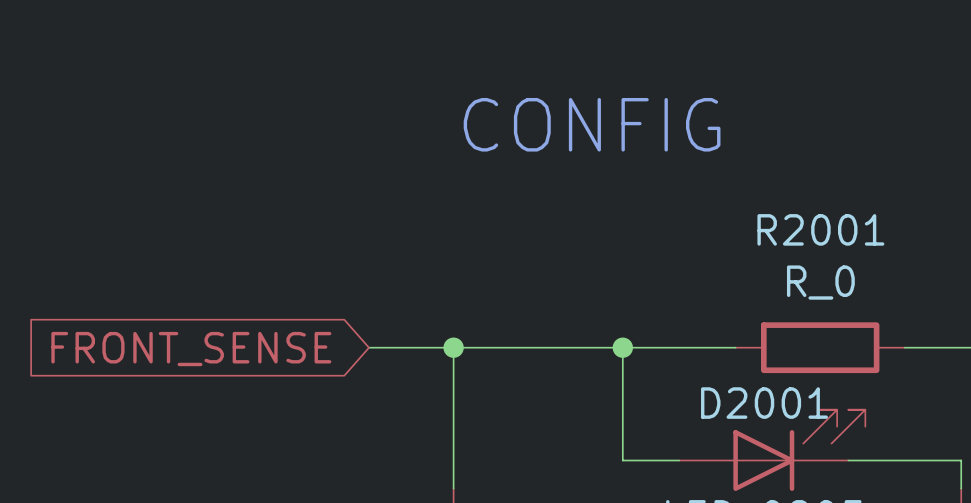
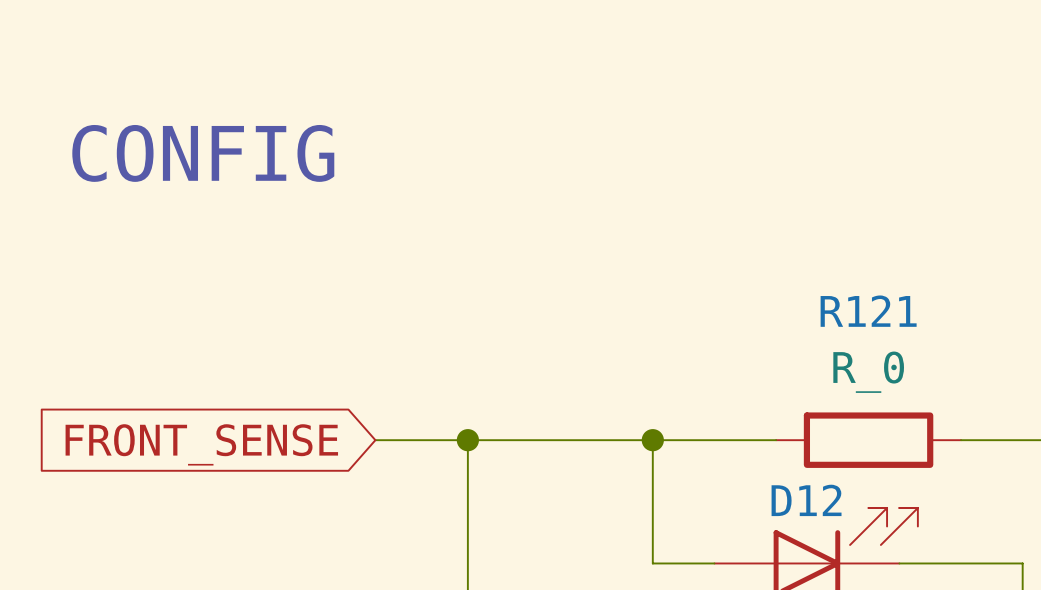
text position: CONFIG (592, 124) -> CONFIG (203, 153)
R2001 name: R2001 (820, 229) -> R121 (868, 311)
D2001 name: D2001 (764, 403) -> D12 (806, 500)

